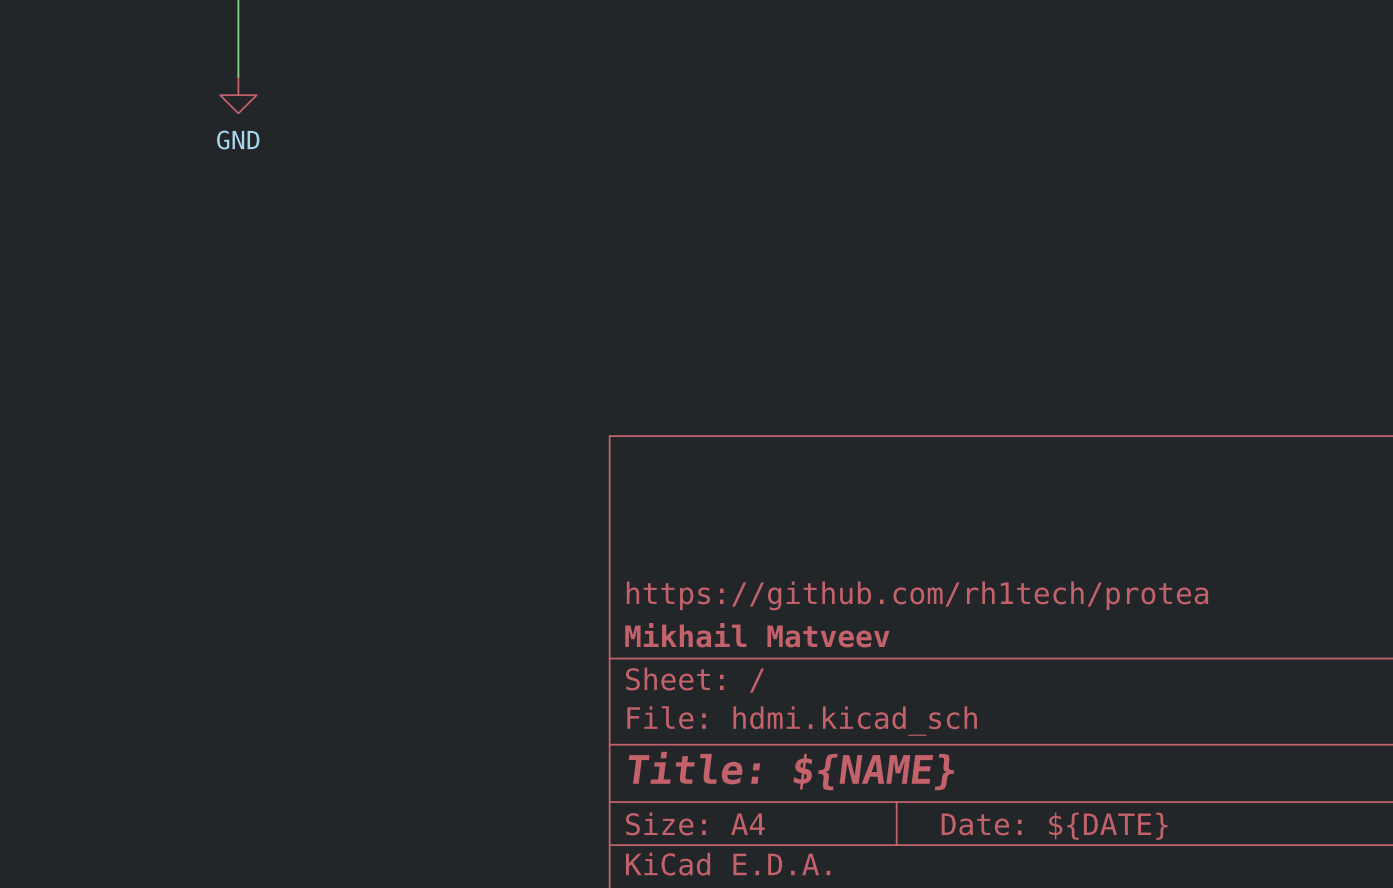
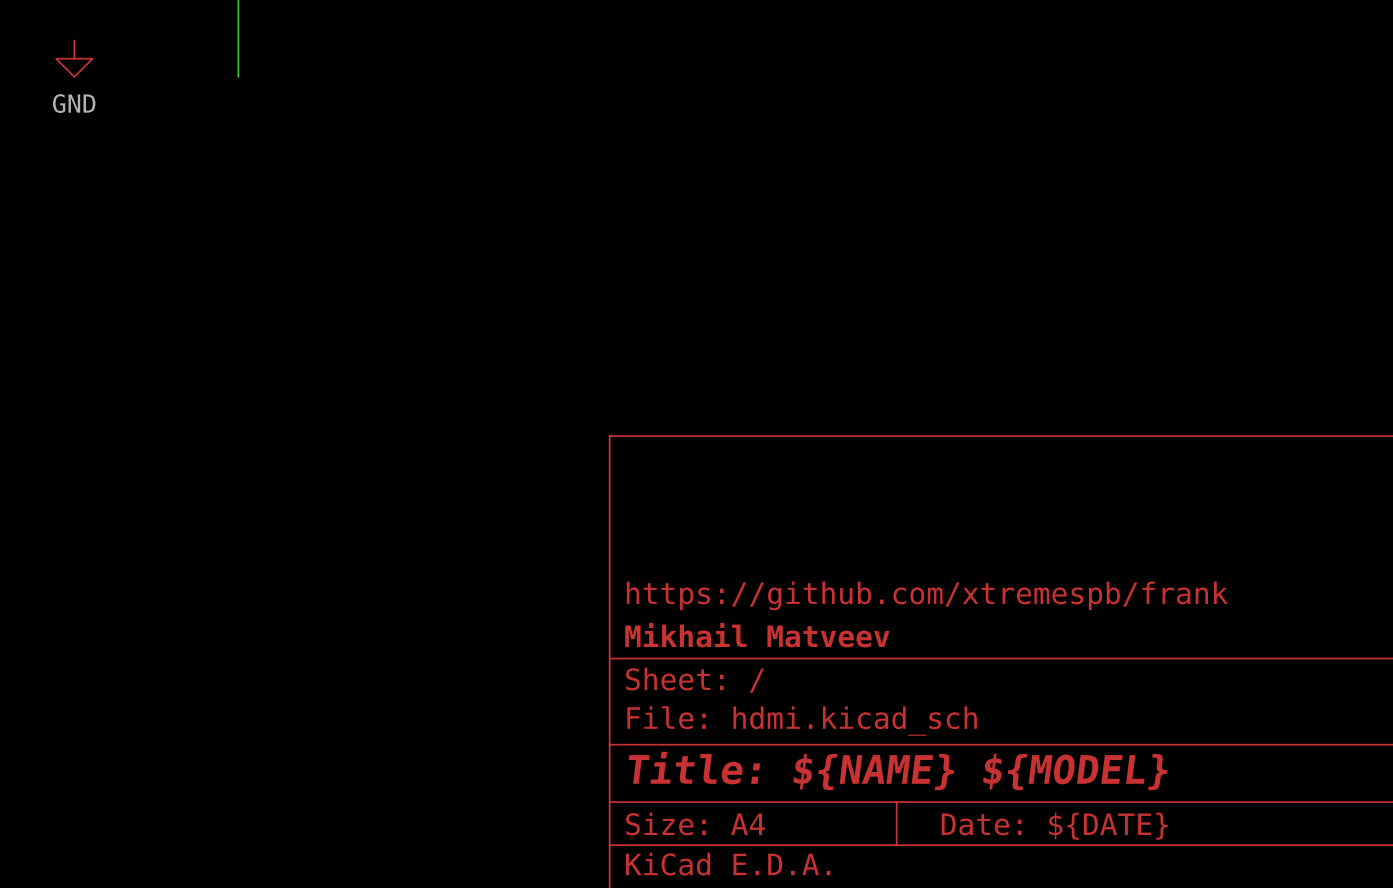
power symbol position: GND (238, 95) -> GND (74, 58)
title block: https://github.com/rh1tech/protea (917, 595) -> https://github.com/xtremespb/frank (927, 595)
title block: Title: ${NAME} (791, 771) -> Title: ${NAME} ${MODEL} (898, 771)

